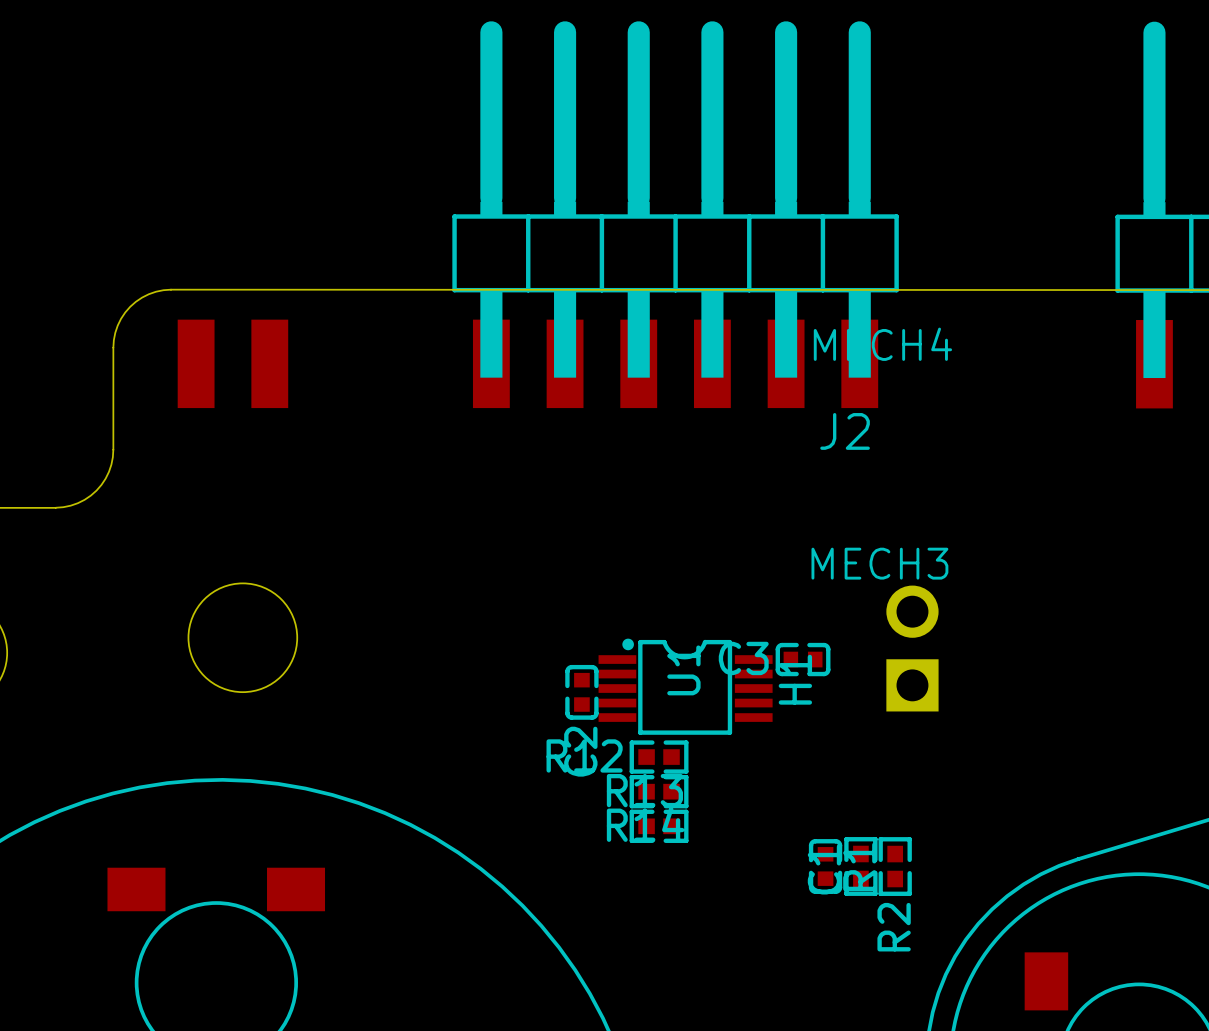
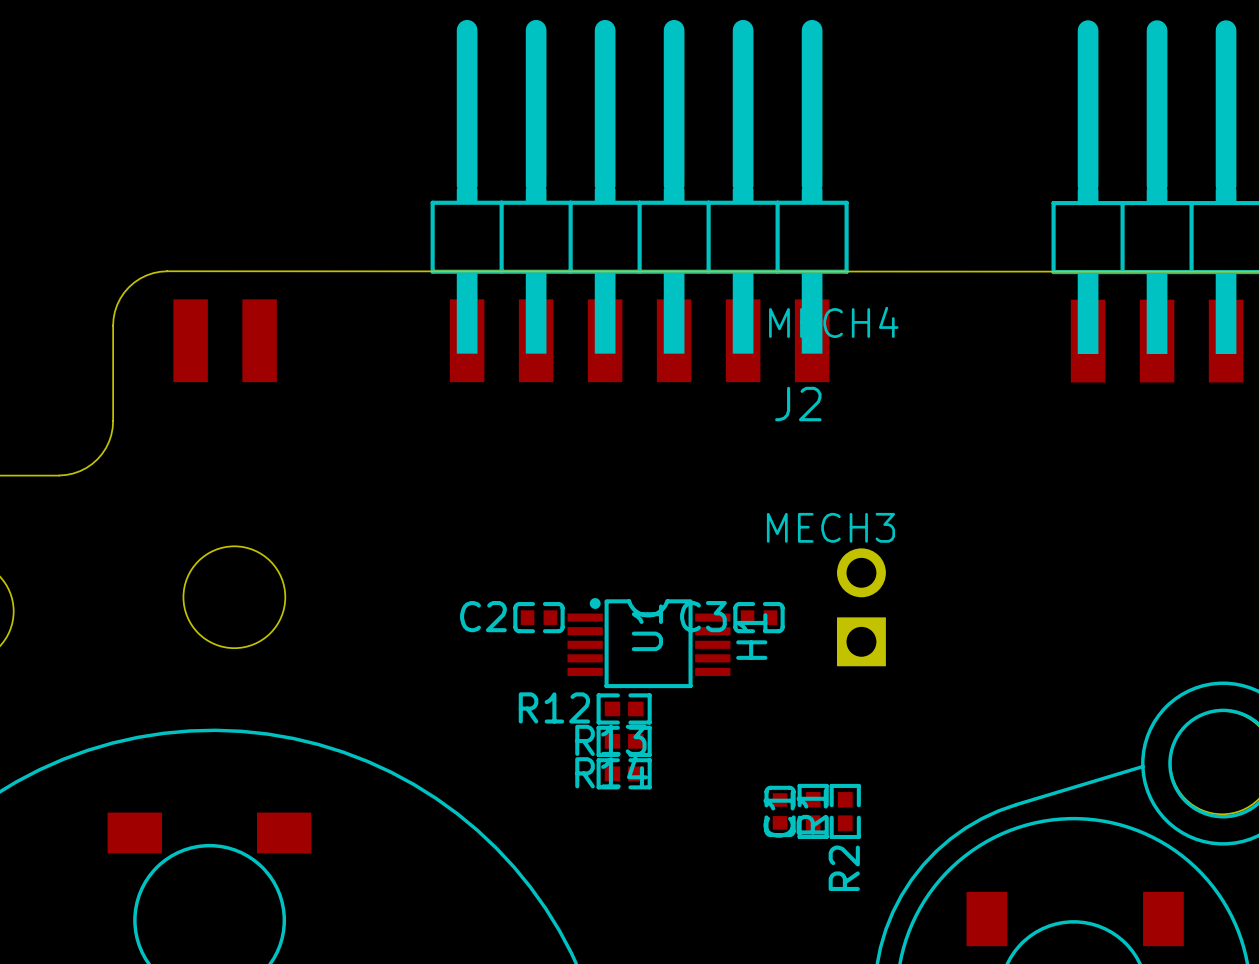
C2 rotation: 0° (581, 692) -> 90° clockwise (538, 617)
C2 position: (581, 692) -> (538, 617)

